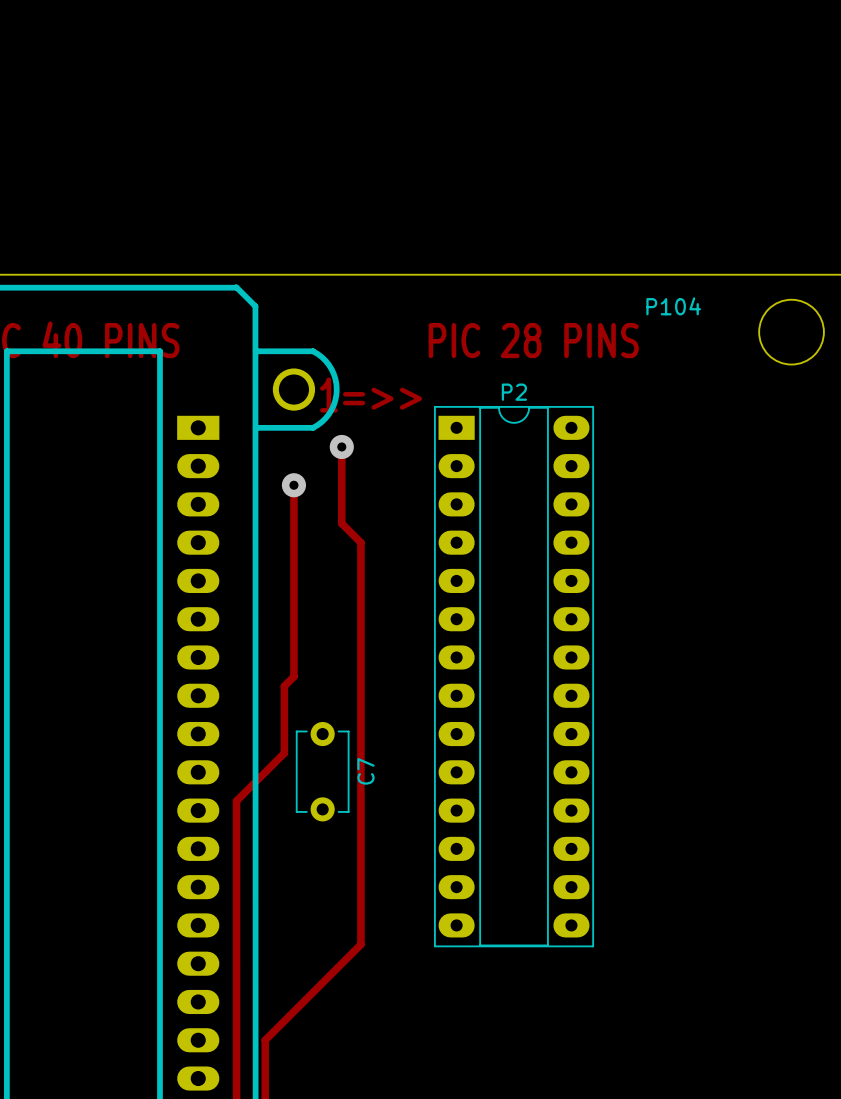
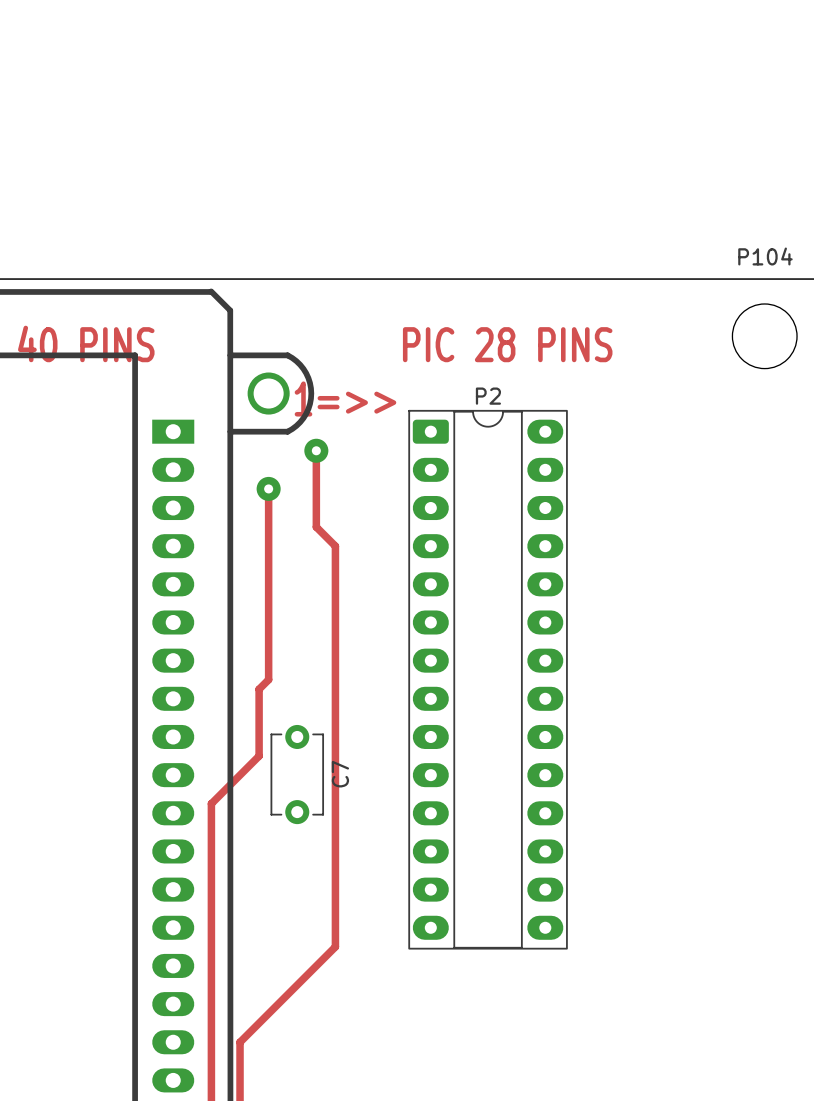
P104 name position: P104 (673, 306) -> P104 (765, 256)
P2 footprint: [434, 405, 595, 948] -> [408, 409, 568, 950]

